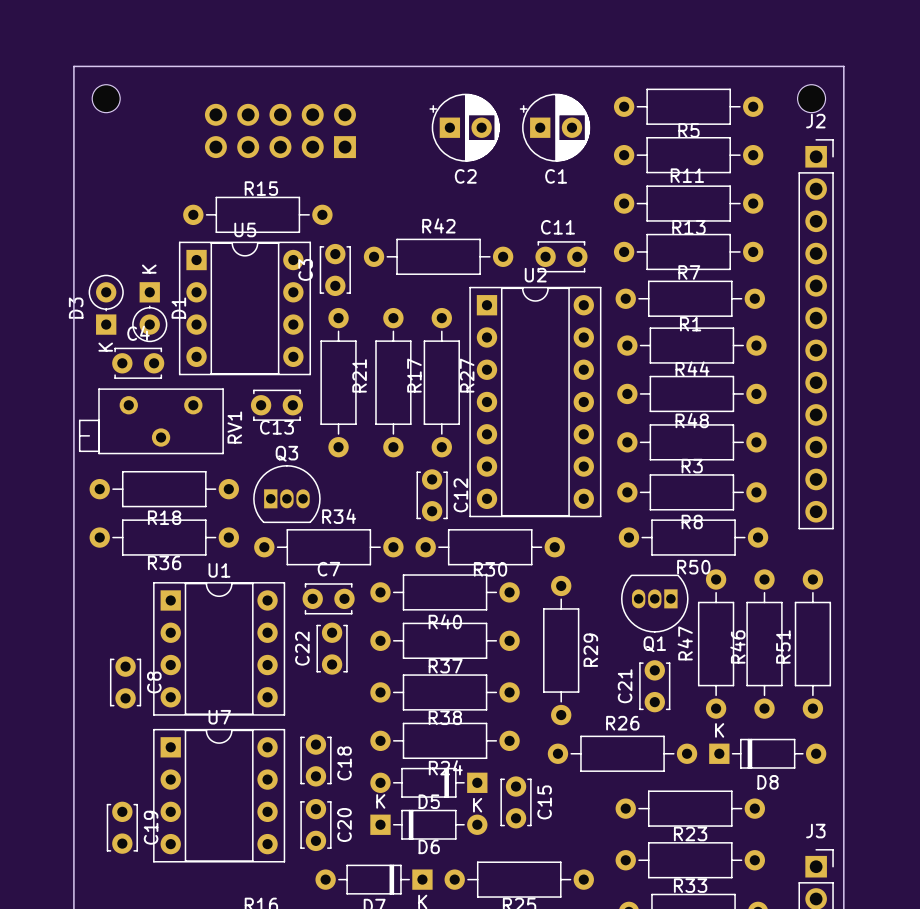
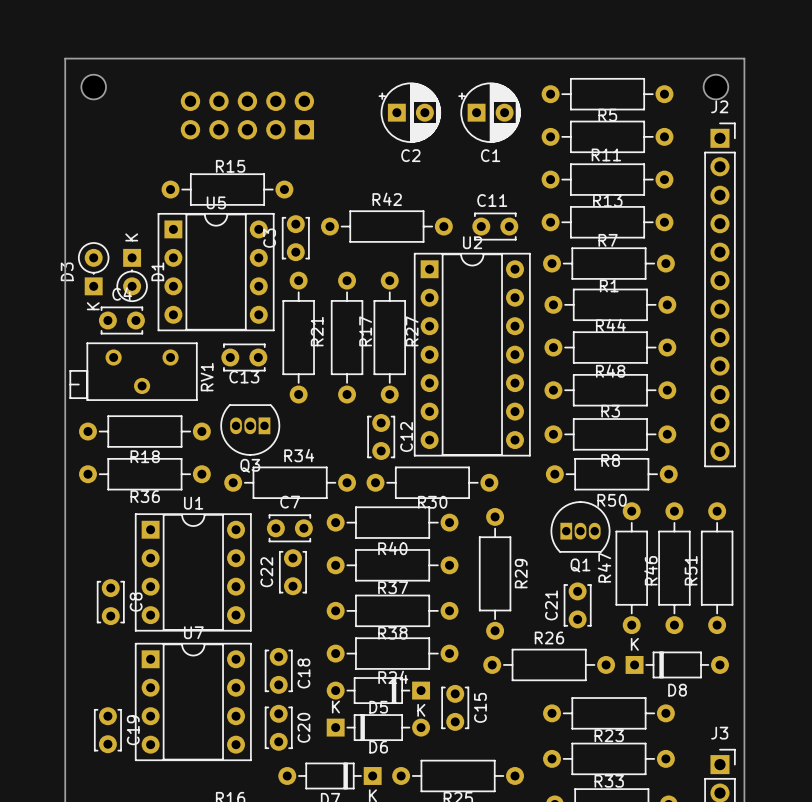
Q3 rotation: 0° (286, 494) -> 180° (250, 430)
Q1 rotation: 0° (654, 603) -> 180° (580, 526)

